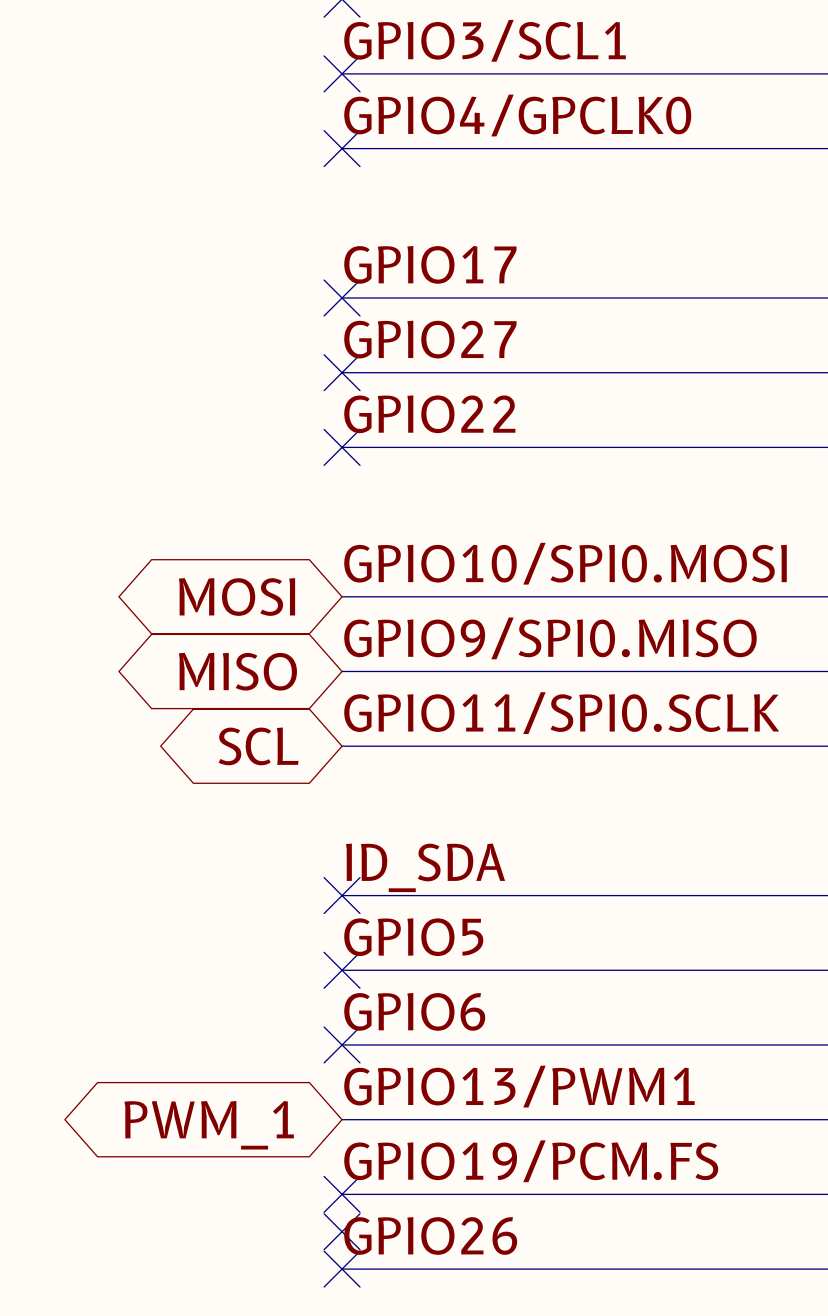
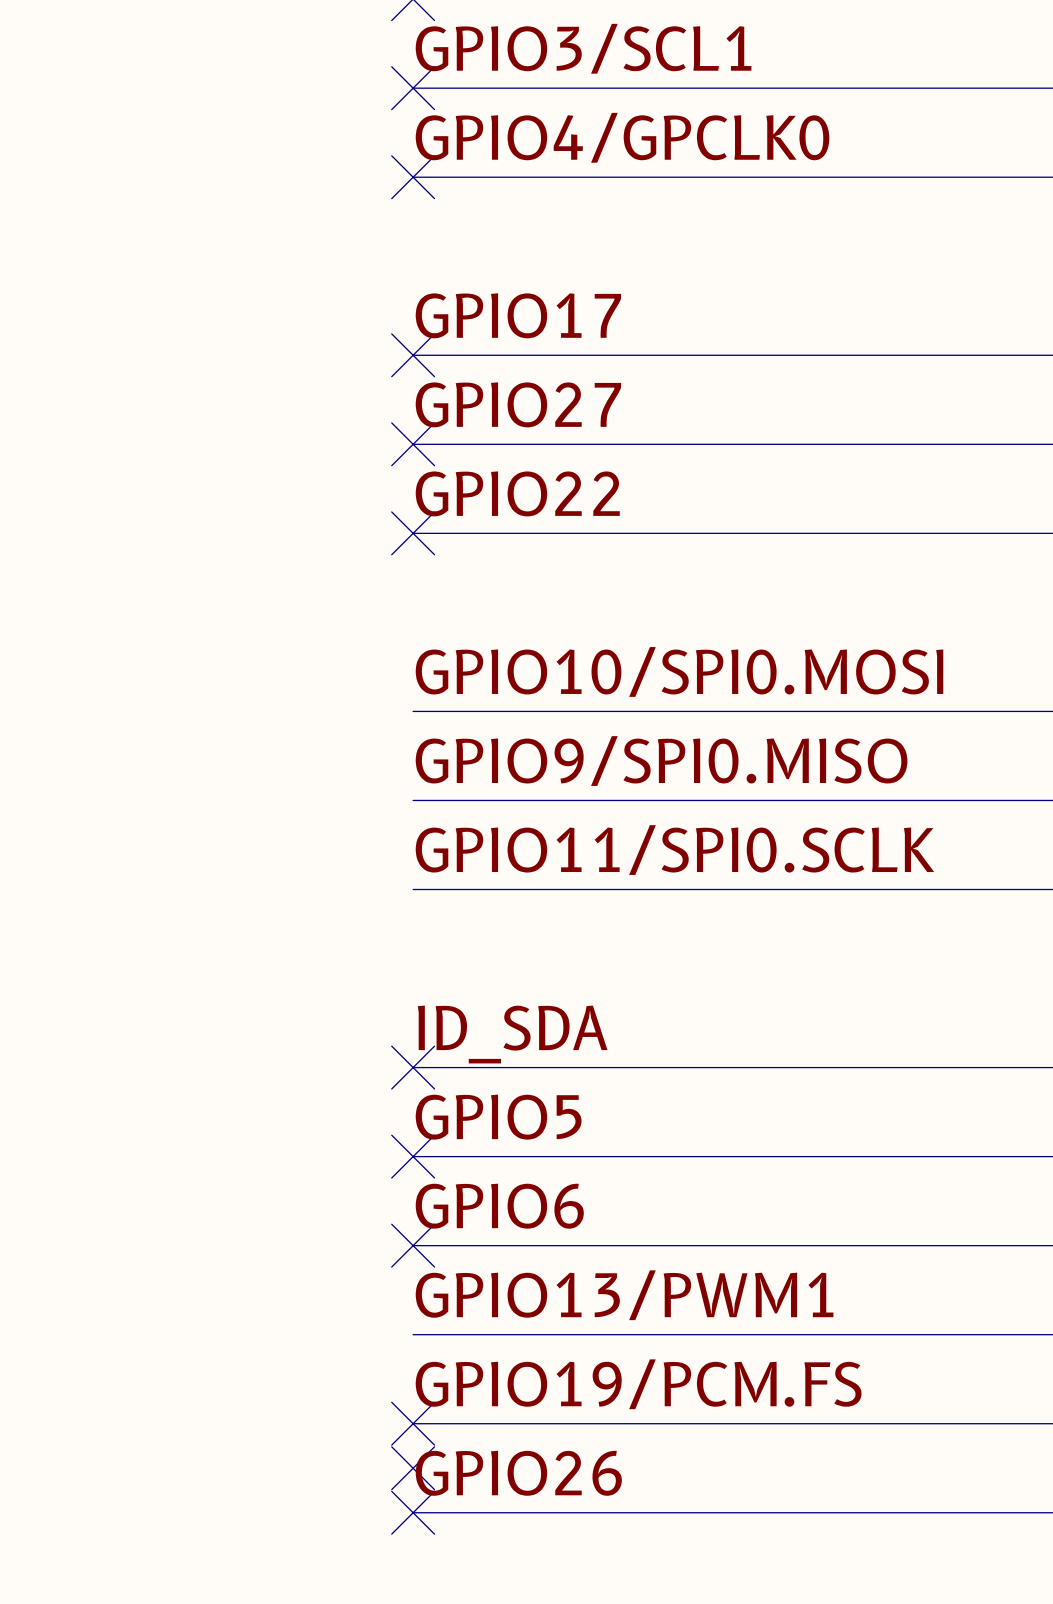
global label: MOSI (237, 597) -> none
global label: MISO (237, 671) -> none
global label: SCL (258, 746) -> none
global label: PWM_1 (209, 1125) -> none

